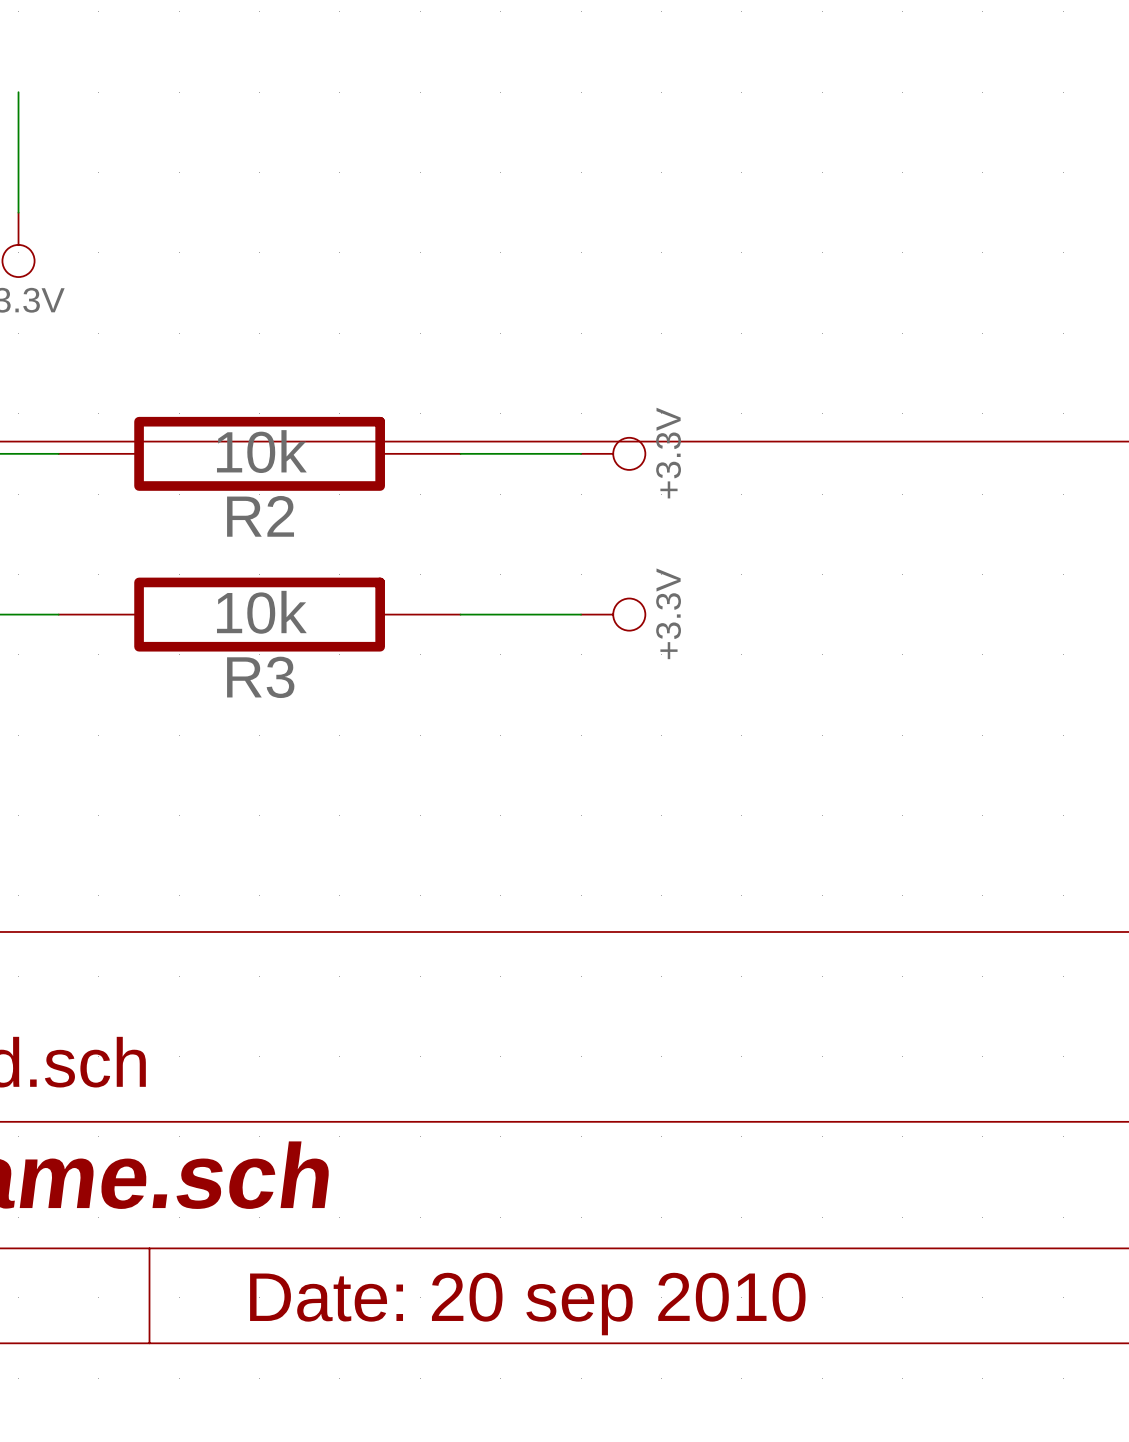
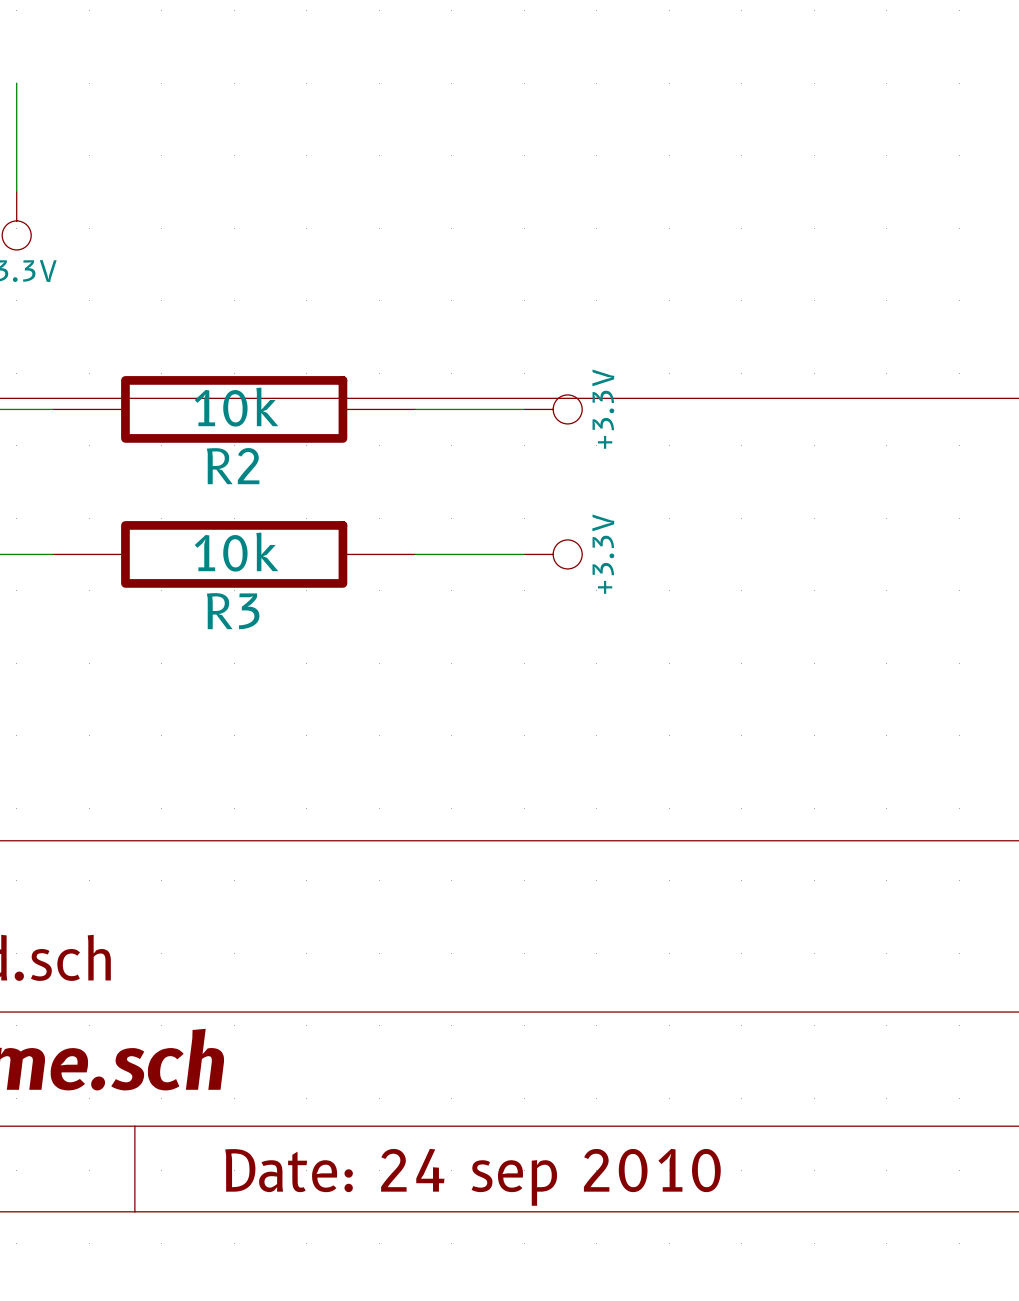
title block: Date: 20 sep 2010 (527, 1304) -> Date: 24 sep 2010 (473, 1177)

